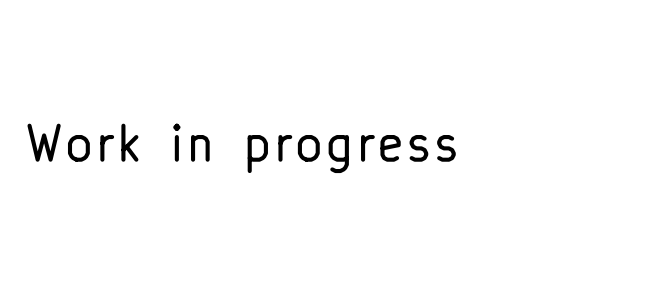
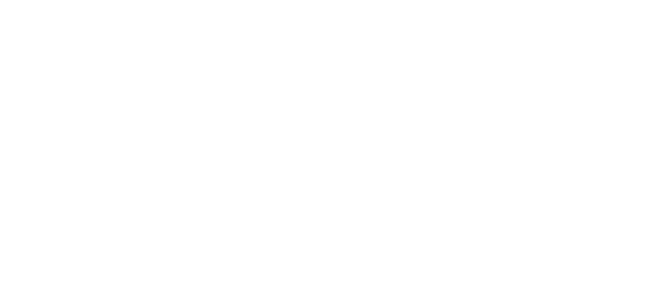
text: Work in progress (241, 148) -> none

